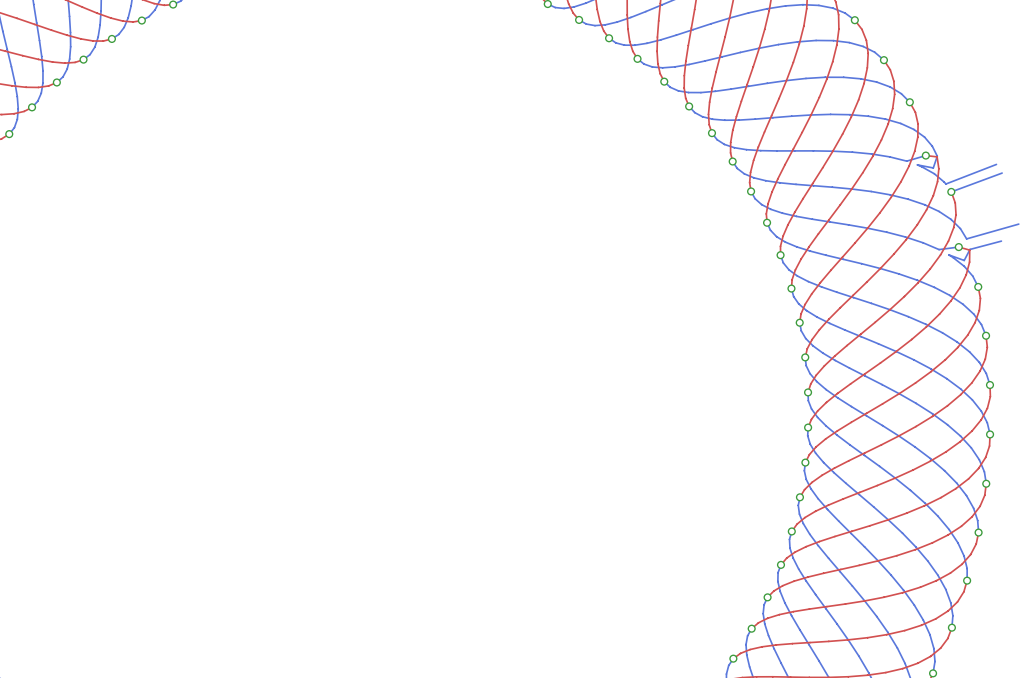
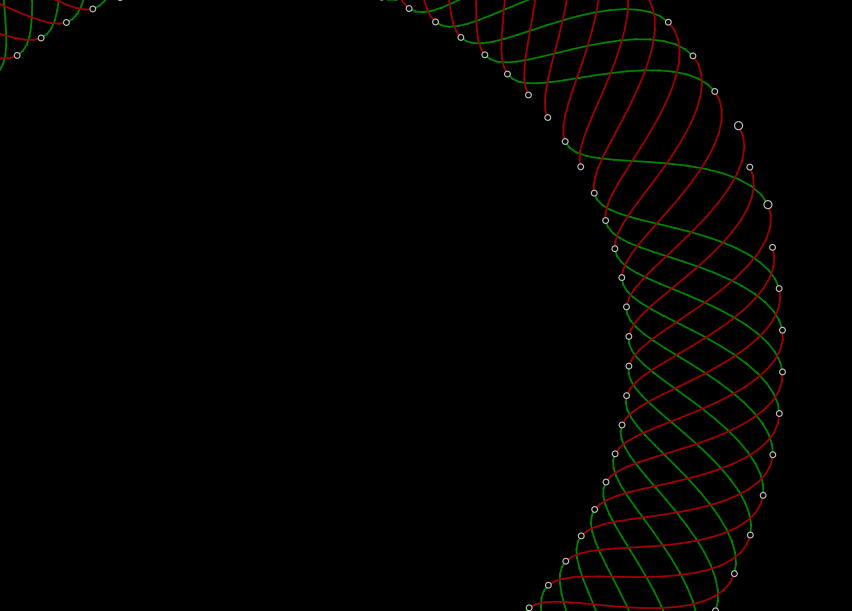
bottom track: (689, 106) (702, 116) (724, 120) (849, 114) (885, 119) (900, 123) (924, 137) (932, 146) (937, 156) (933, 167) (917, 164) (934, 173) (945, 184) (996, 164) -> none
bottom track: (711, 133) (724, 144) (746, 149) (852, 152) (906, 161) (925, 155) -> none
top track: none -> (738, 125) (743, 135) (744, 147) (742, 160) (728, 188) (706, 217) (642, 279) (628, 298) (626, 306)
via: none -> (738, 125)
top track: (925, 155) (937, 156) (938, 168) (937, 181) (926, 209) (893, 254) (819, 329) (807, 348) (805, 357) -> none
via: (925, 155) -> none
bottom track: (737, 168) (744, 173) (765, 180) (871, 191) (908, 199) (939, 211) (951, 219) (960, 228) (966, 238) (1018, 224) -> (569, 147) (576, 152) (599, 158) (687, 165) (723, 173) (751, 186) (761, 194) (767, 204)
bottom track: (1002, 173) (951, 191) -> none
bottom track: (751, 191) (761, 204) (782, 213) (886, 232) (939, 249) (958, 247) -> none
top track: none -> (767, 204) (770, 215) (770, 227) (766, 239) (748, 265) (721, 289) (649, 341) (632, 357) (629, 365)
via: none -> (767, 204)
bottom track: (1001, 241) (969, 249) (964, 260) (949, 254) (964, 266) (972, 276) (978, 286) -> none
top track: (958, 247) (969, 250) (969, 262) (966, 274) (950, 300) (911, 339) (826, 402) (811, 419) (808, 427) -> none
via: (958, 247) -> none

